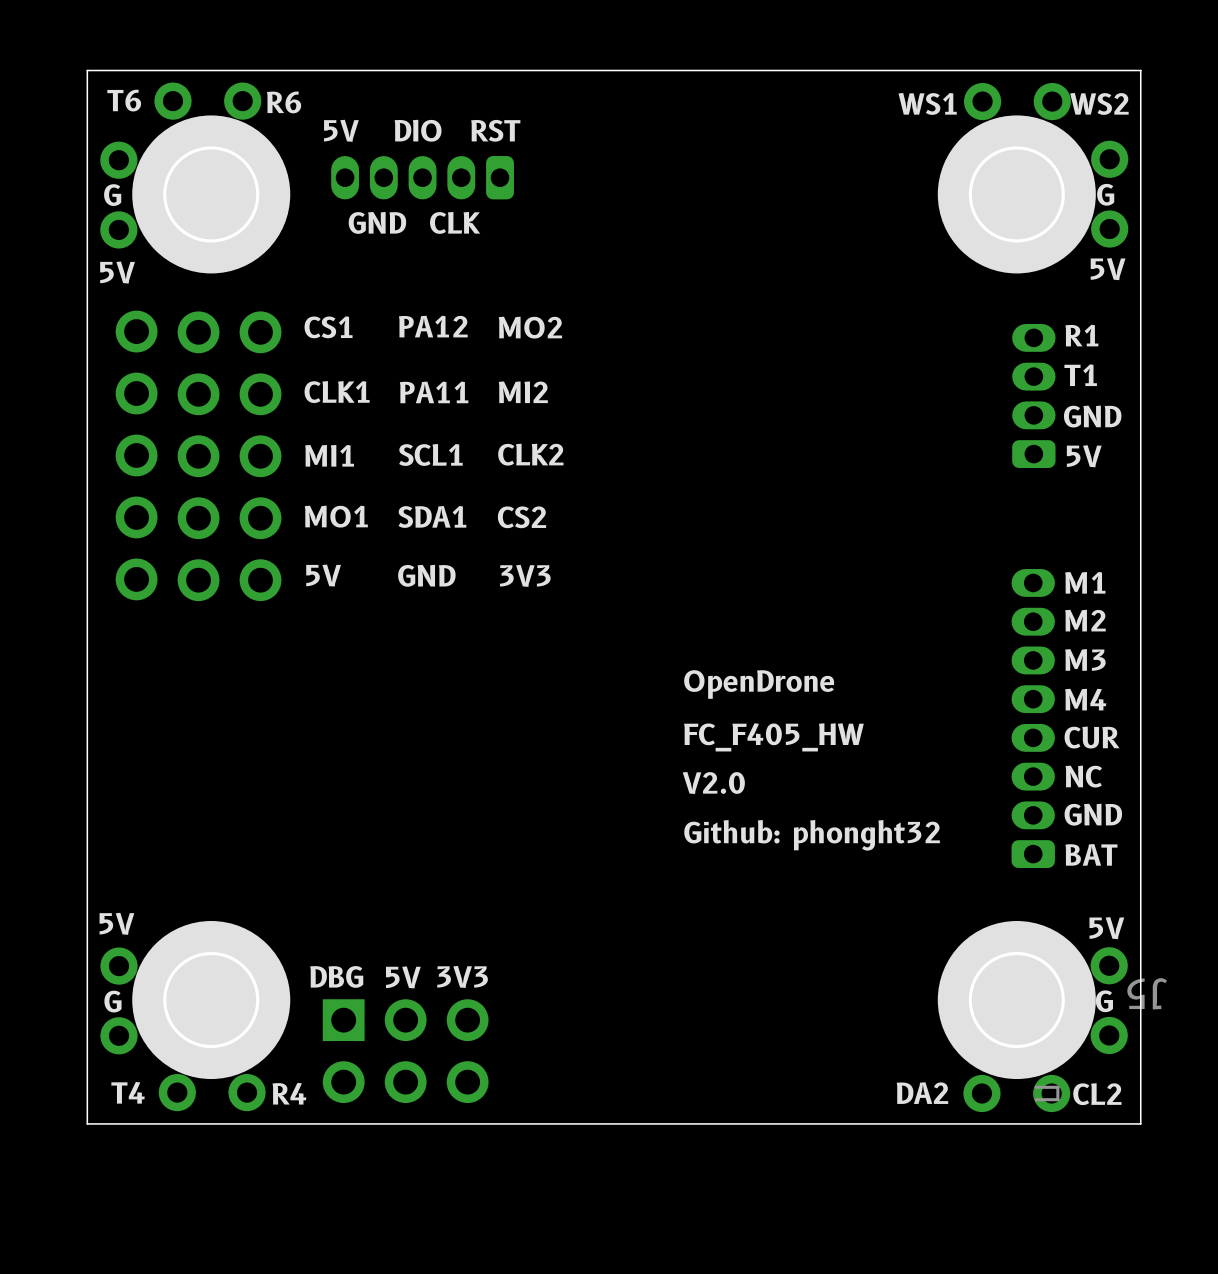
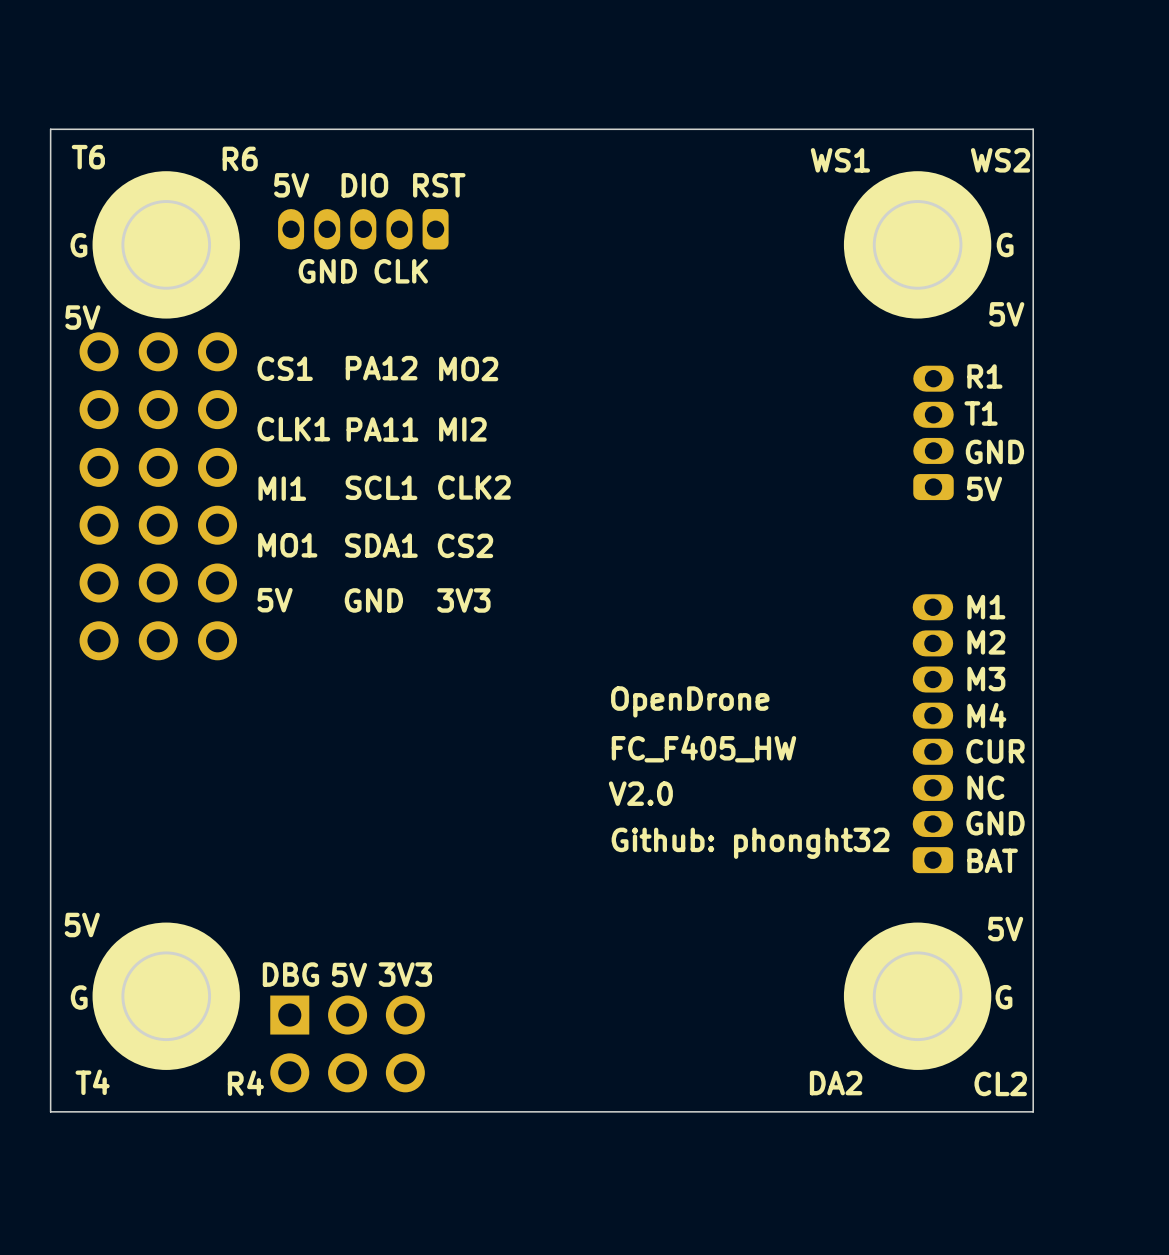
part: (207, 101) -> none
part: (1017, 101) -> none
part: (1109, 194) -> none
part: (118, 195) -> none
part footprint: [115, 310, 158, 601] -> [79, 332, 119, 661]
part footprint: [177, 311, 220, 602] -> [138, 332, 178, 661]
part footprint: [239, 311, 282, 602] -> [198, 332, 238, 661]
part: (118, 1000) -> none
part: (1109, 1000) -> none
J5: (1016, 1091) -> none
part: (212, 1092) -> none

